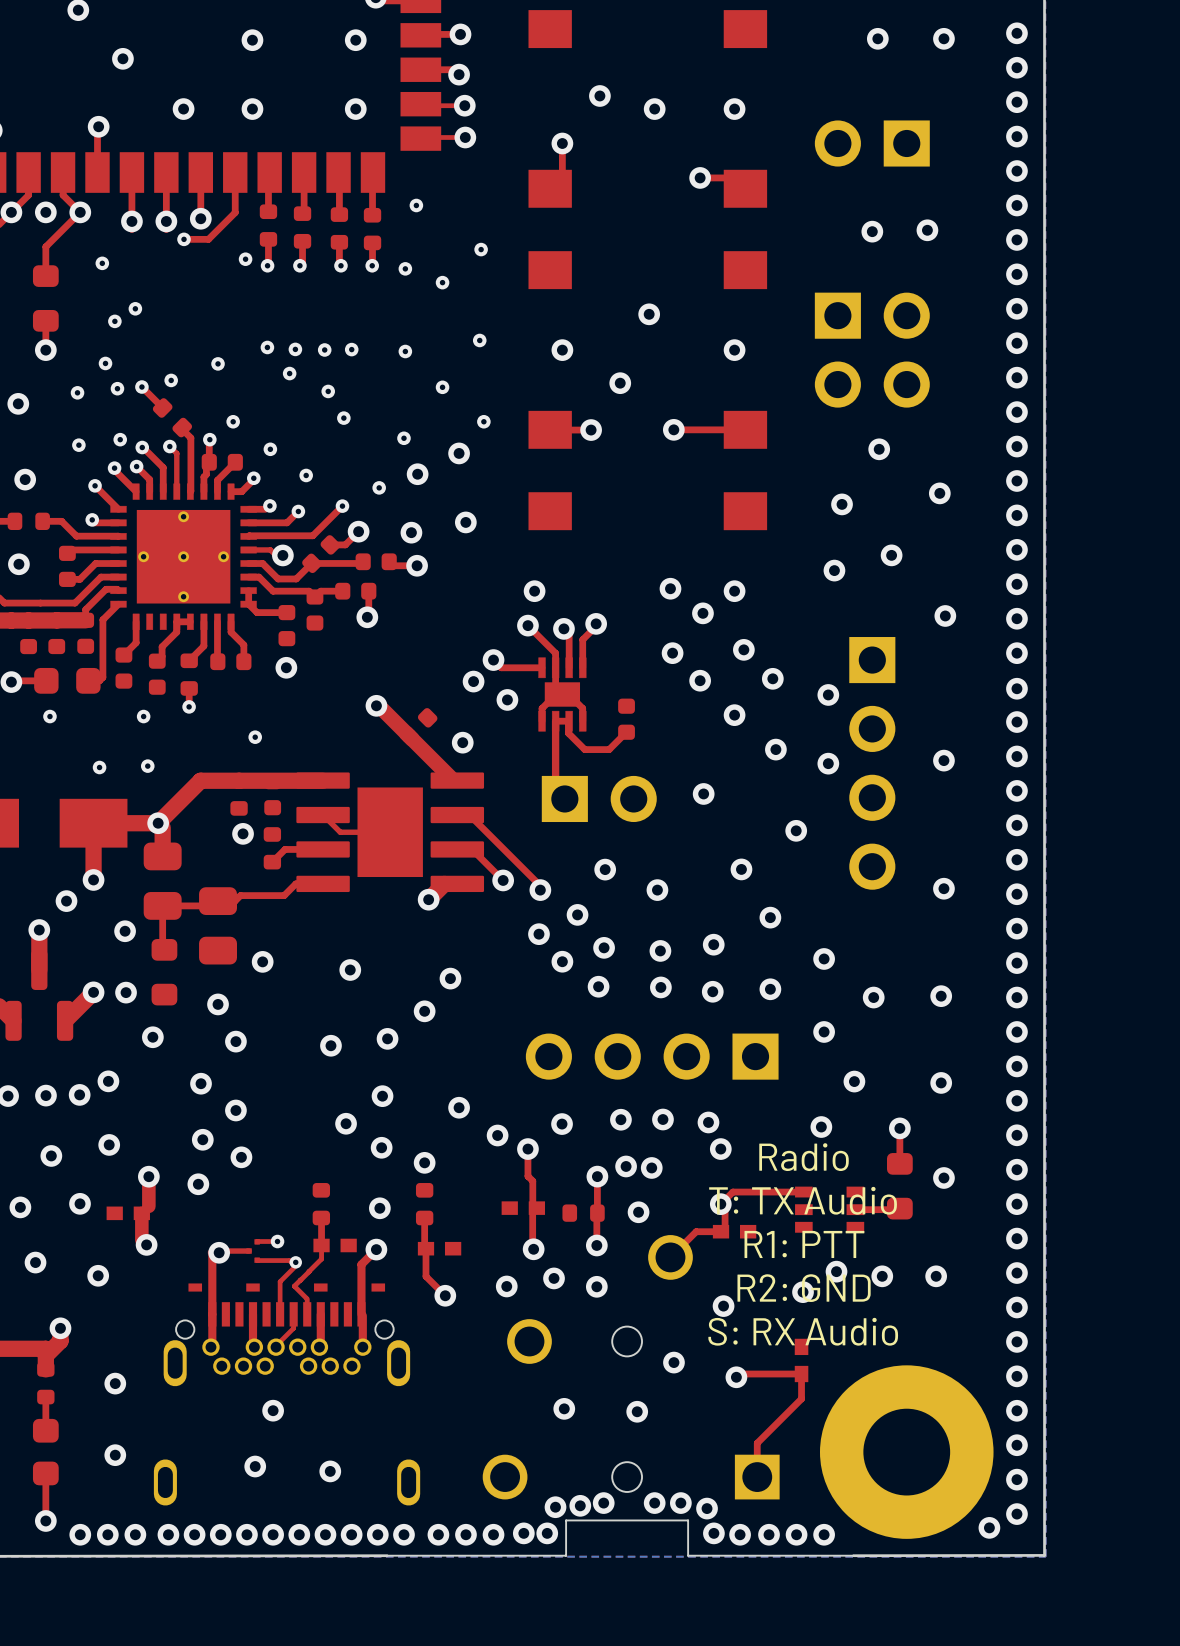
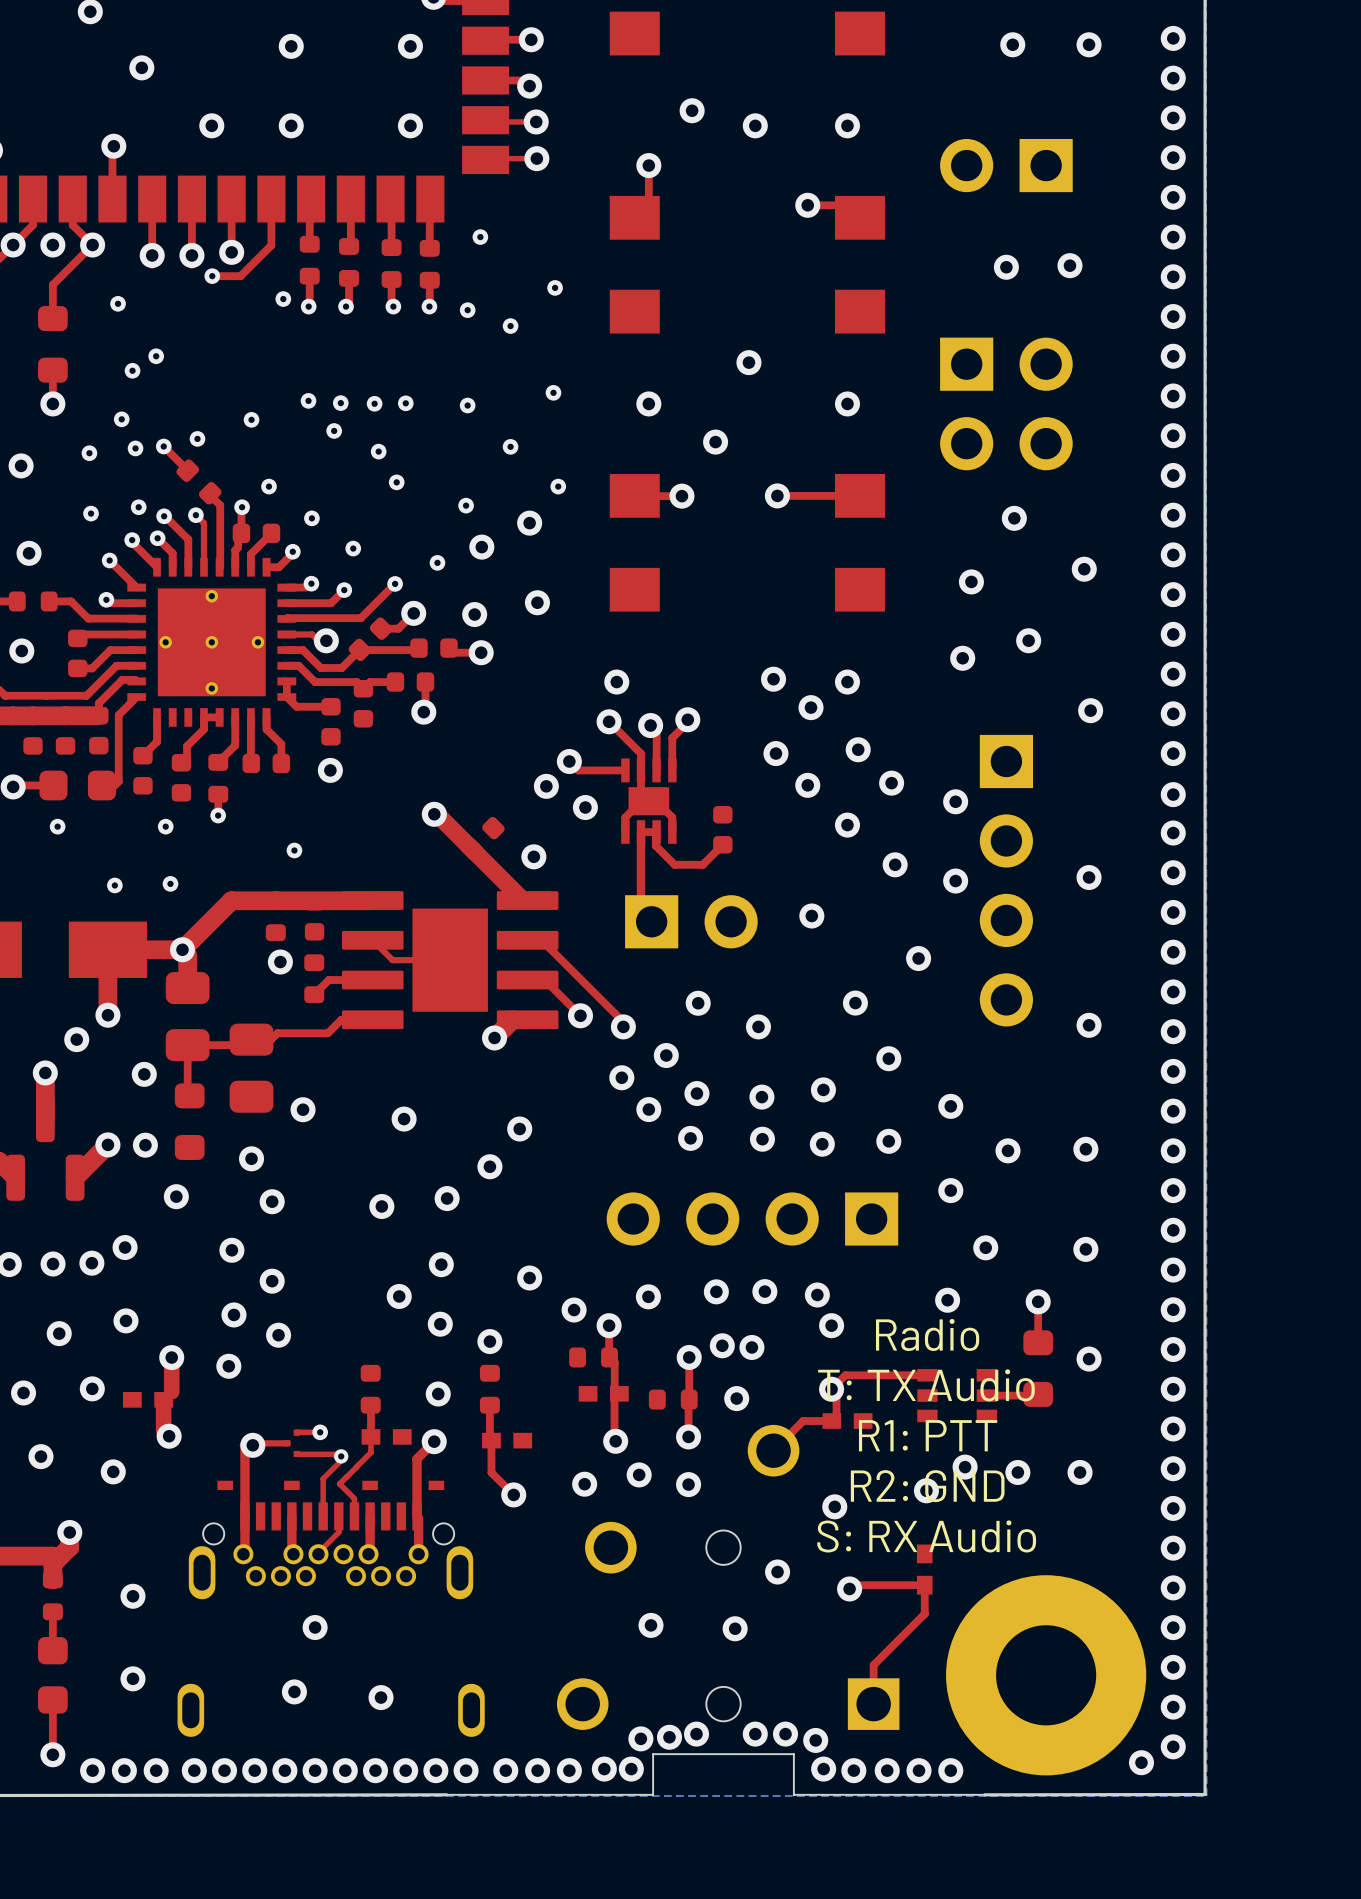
part: none -> (593, 1357)

